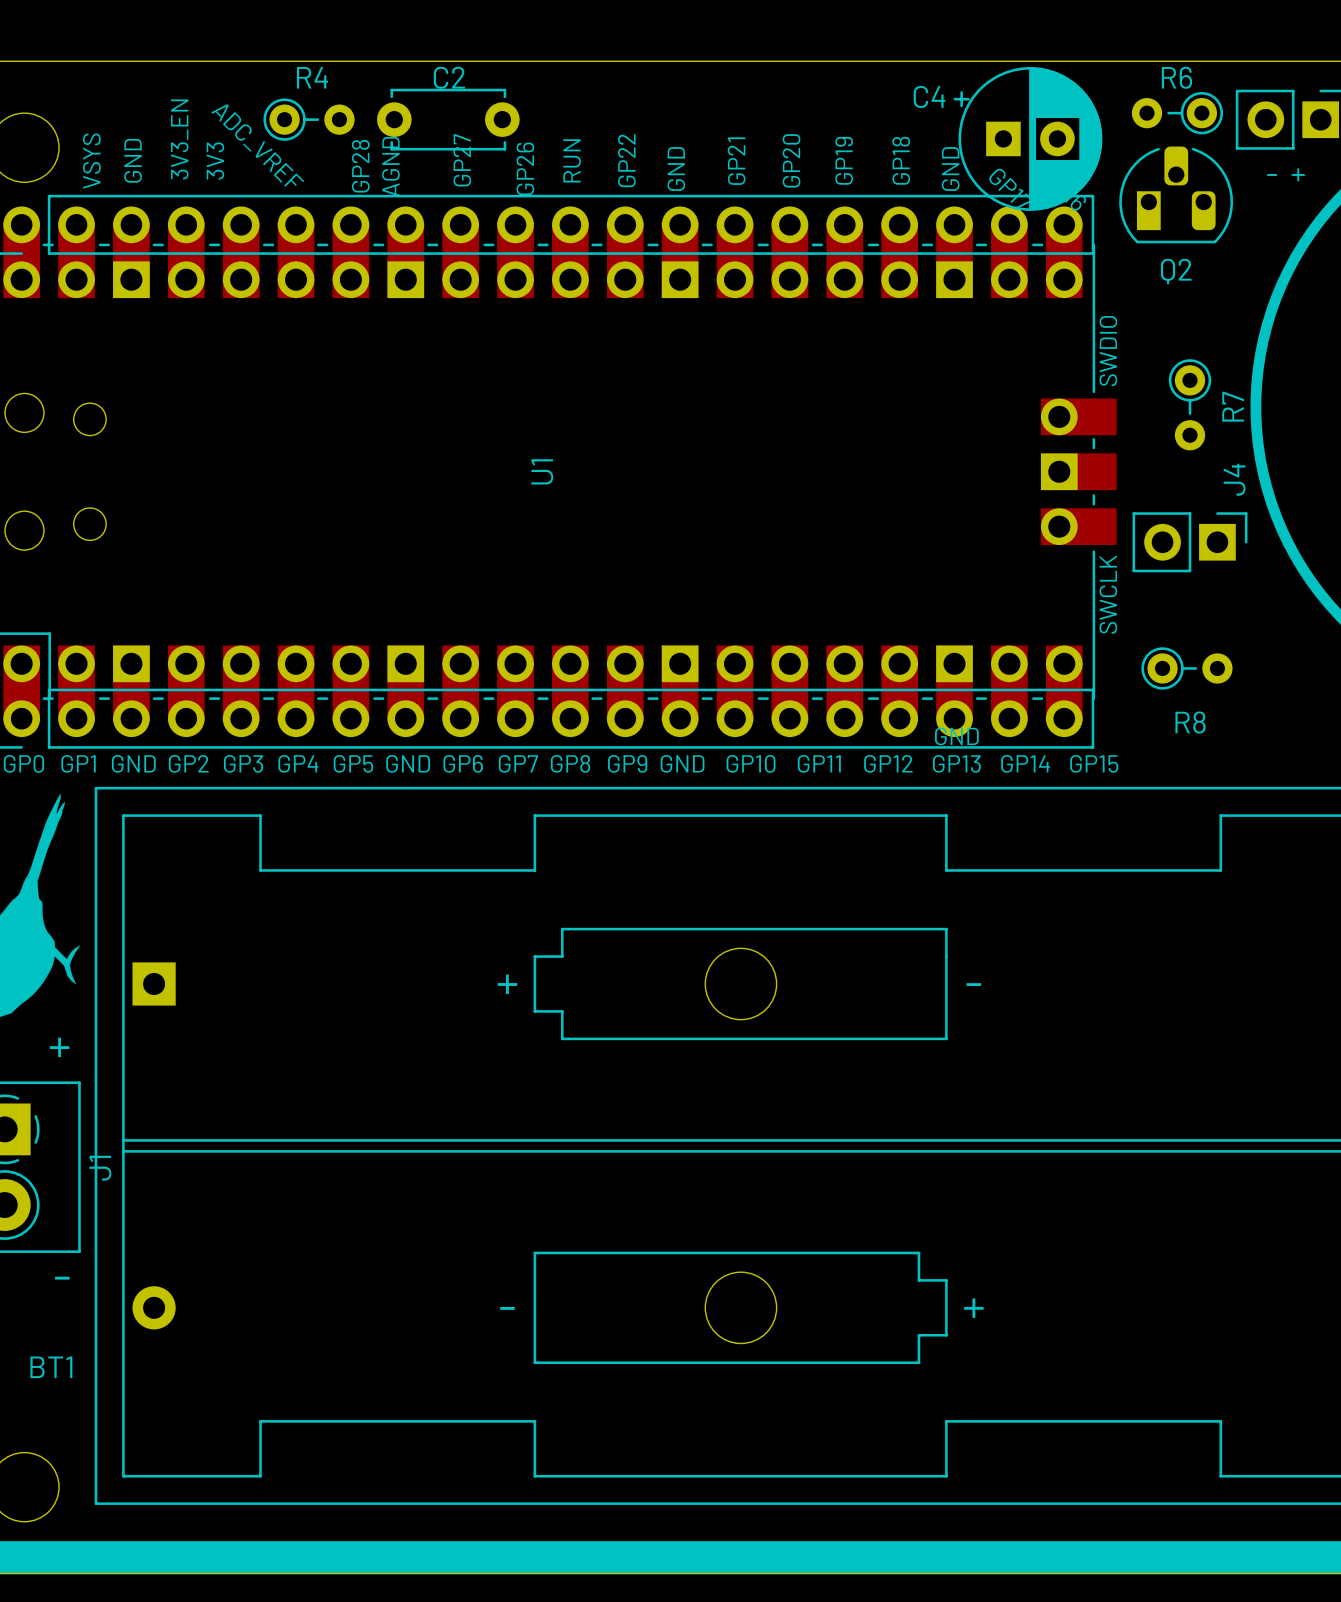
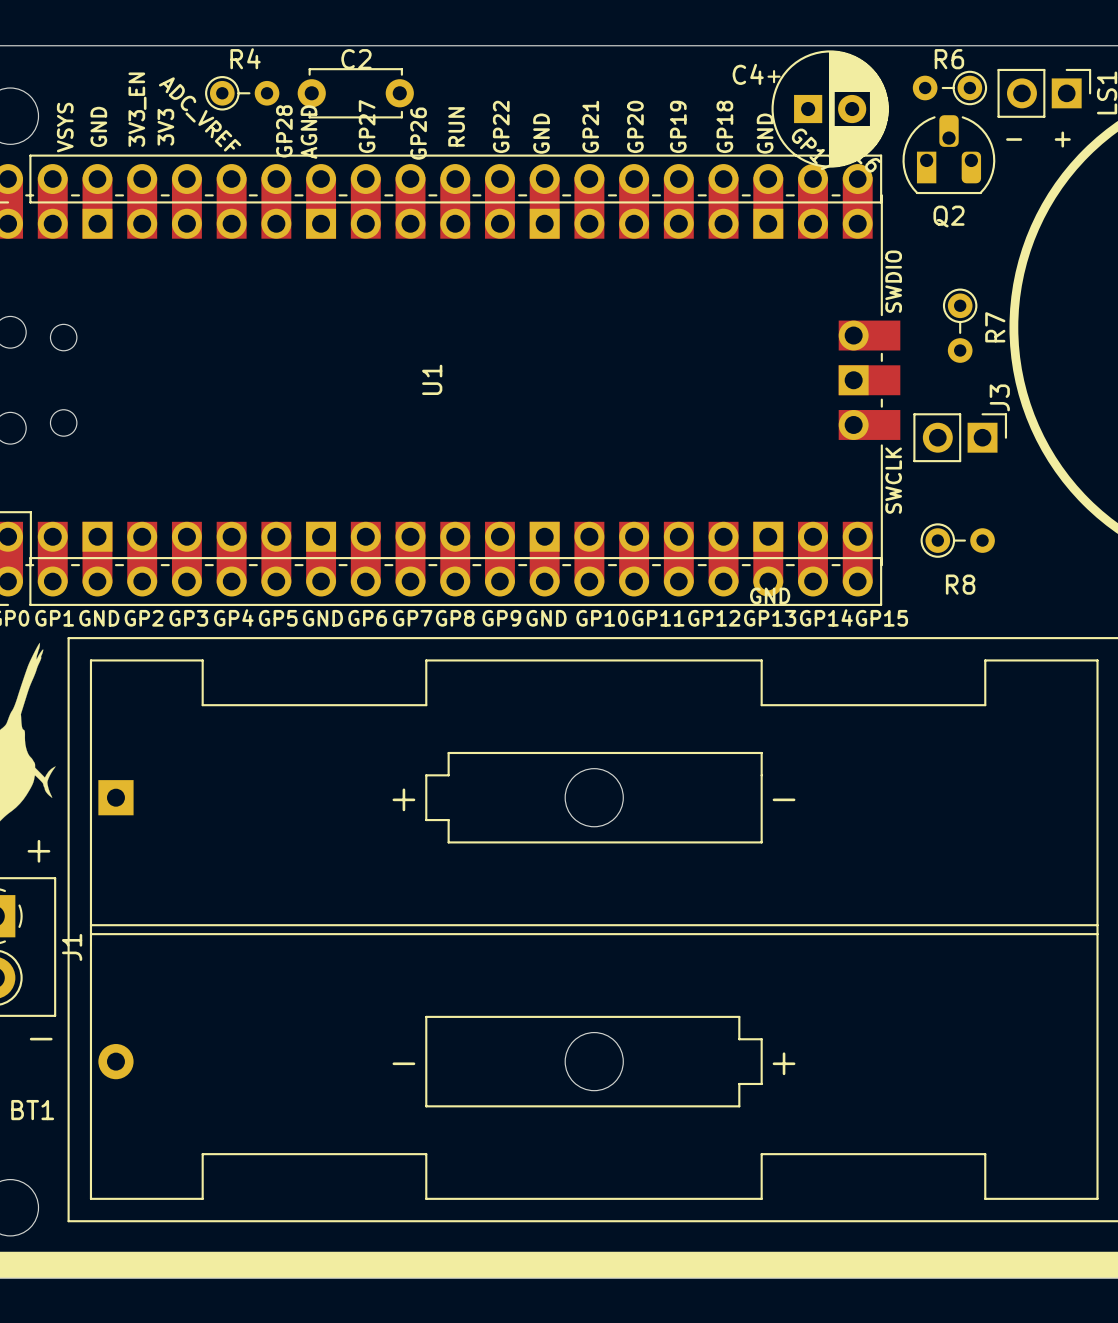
J4 name: J4 (1234, 479) -> J3 (999, 397)

